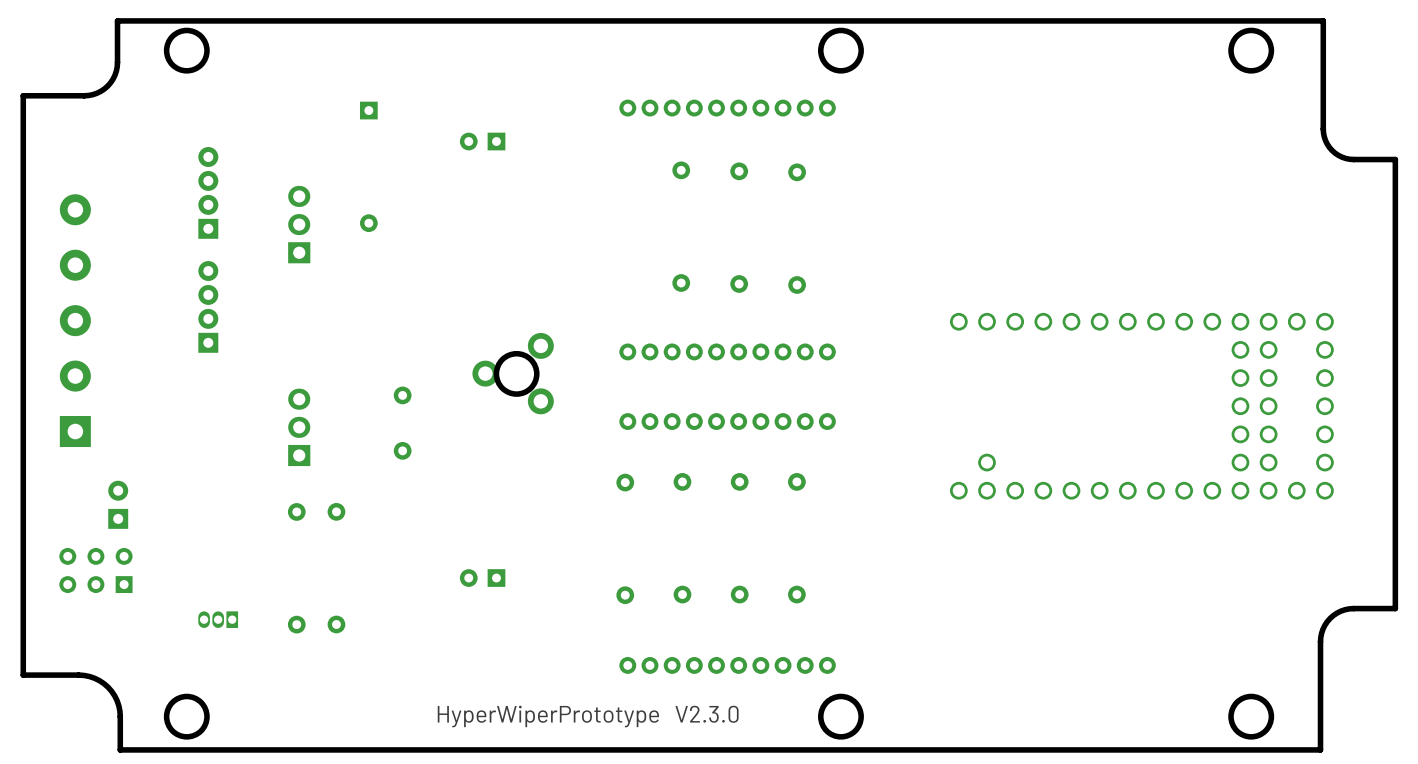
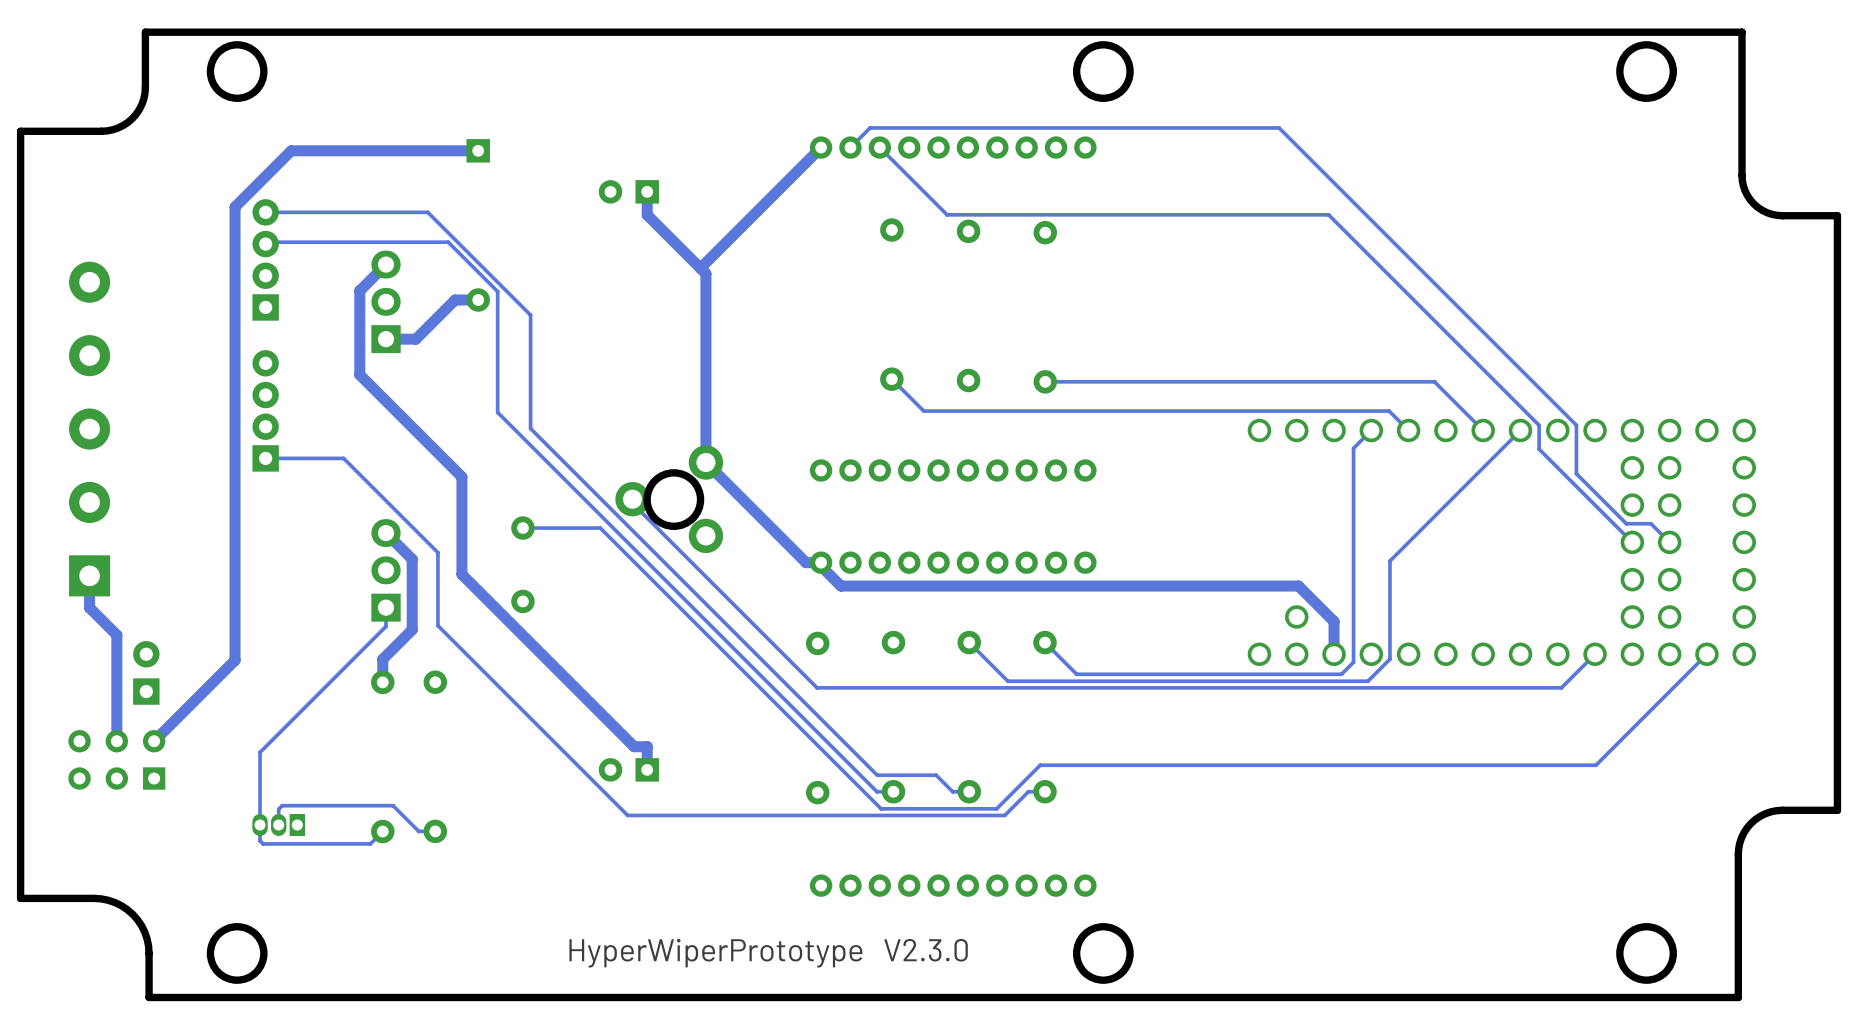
track: none -> (821, 147) (700, 268)
track: none -> (850, 147) (870, 127) (1279, 127) (1576, 425) (1576, 473) (1626, 523) (1651, 523) (1669, 542)
track: none -> (879, 147) (947, 214) (1328, 214) (1539, 425) (1539, 449) (1632, 542)
track: none -> (478, 150) (291, 150) (235, 207) (235, 660) (154, 741)
track: none -> (647, 191) (647, 214) (705, 273) (705, 462) (806, 562) (821, 562) (821, 566) (840, 586) (1298, 586) (1334, 621) (1334, 654)
track: none -> (265, 212) (427, 212) (530, 315) (530, 428) (877, 775) (936, 775) (952, 791) (969, 791)
track: none -> (265, 244) (267, 242) (448, 242) (497, 291) (497, 412) (876, 791) (893, 791)
track: none -> (386, 264) (359, 290) (359, 374) (461, 477) (461, 574) (634, 746) (647, 746) (647, 769)
track: none -> (478, 300) (455, 300) (415, 339) (386, 339)
track: none -> (891, 379) (923, 411) (1389, 411) (1408, 430)
track: none -> (1045, 381) (1434, 381) (1483, 430)
track: none -> (1371, 430) (1353, 448) (1353, 662) (1341, 674) (1076, 674) (1045, 642)
track: none -> (1520, 430) (1389, 561) (1389, 659) (1367, 681) (1007, 681) (969, 642)
track: none -> (265, 458) (343, 458) (437, 552) (437, 625) (627, 815) (1004, 815) (1028, 791) (1045, 791)
track: none -> (632, 499) (632, 503) (817, 687) (1561, 687) (1595, 654)
track: none -> (522, 528) (600, 528) (881, 808) (996, 808) (1040, 765) (1595, 765) (1706, 654)
track: none -> (386, 533) (412, 559) (412, 629) (382, 659) (382, 682)
track: none -> (89, 575) (89, 607) (116, 635) (116, 741)
track: none -> (386, 607) (386, 626) (260, 752) (260, 840) (263, 843) (370, 843) (382, 831)
track: none -> (278, 825) (278, 809) (282, 805) (393, 805) (418, 831) (435, 831)

